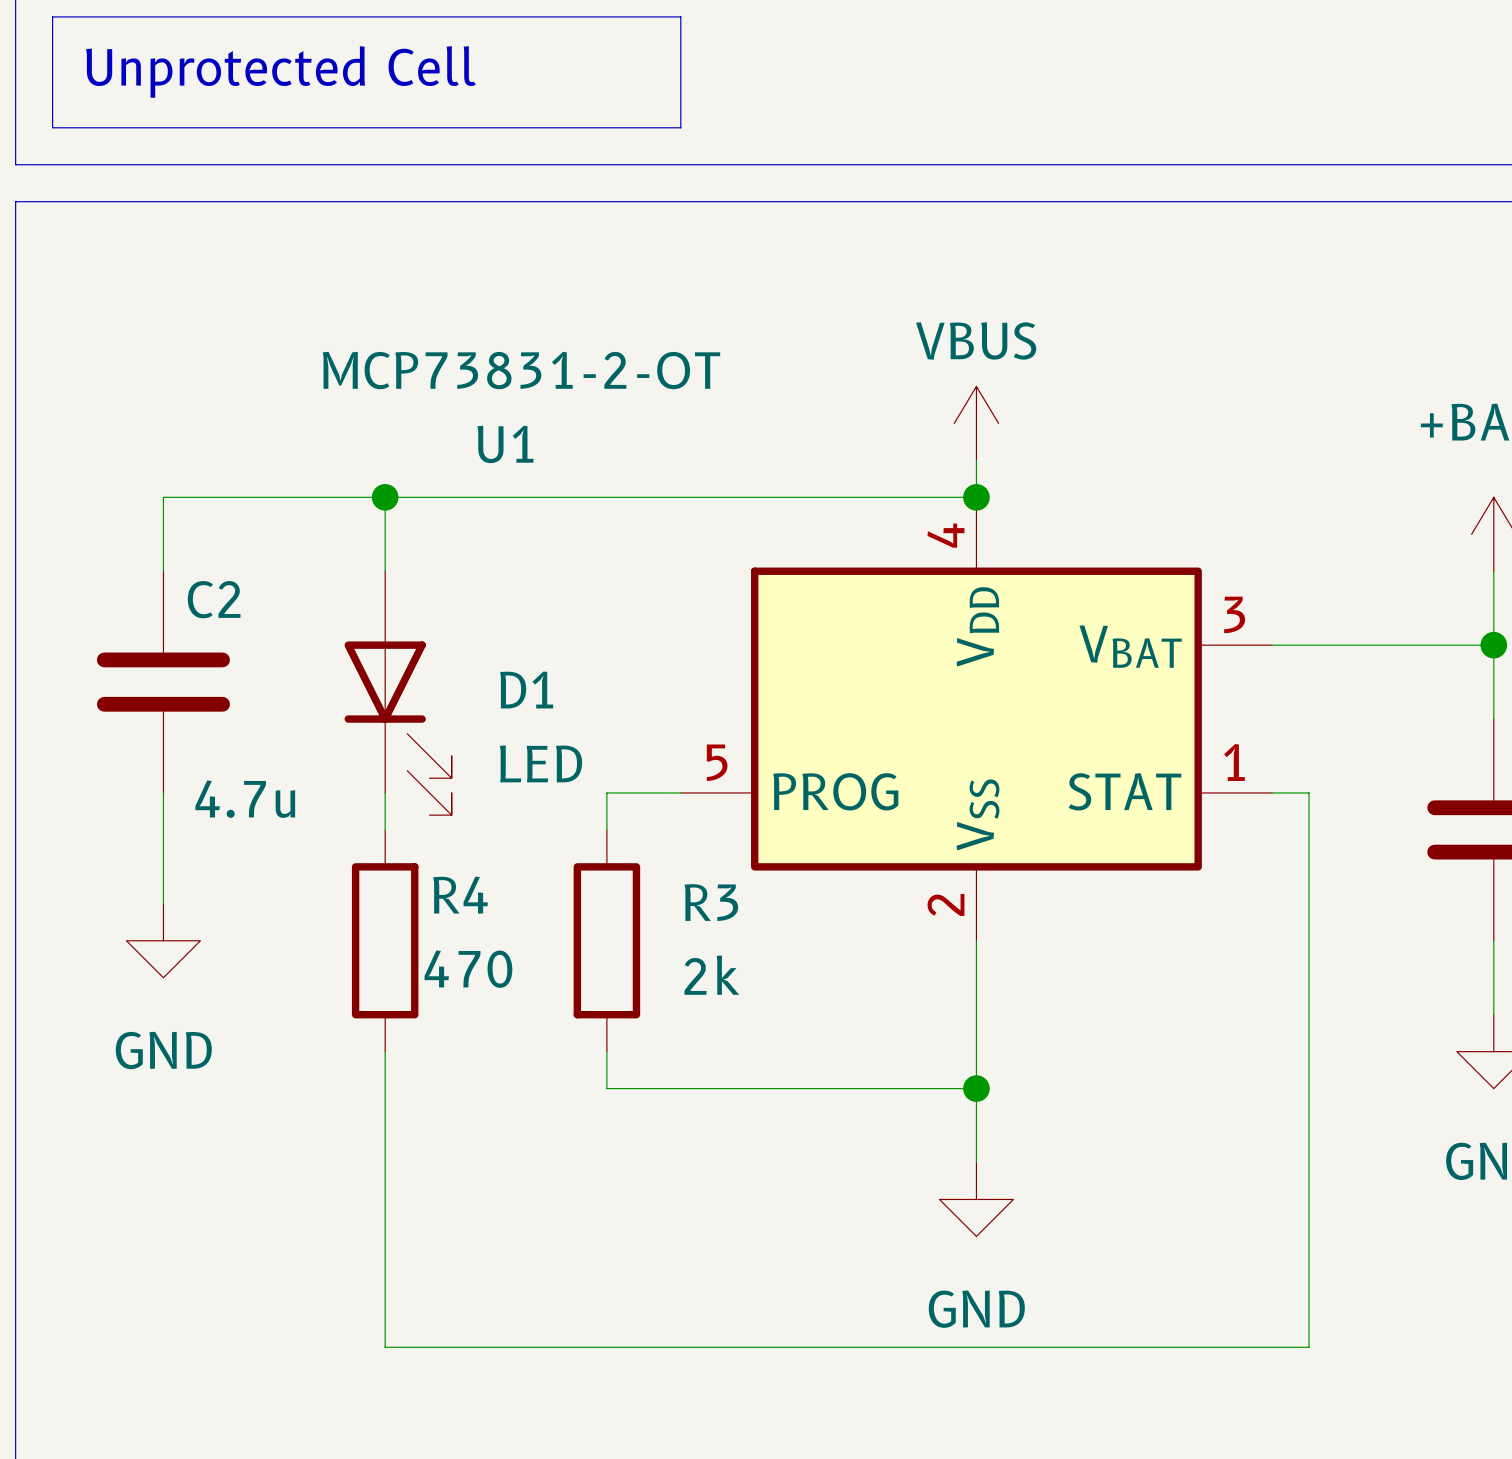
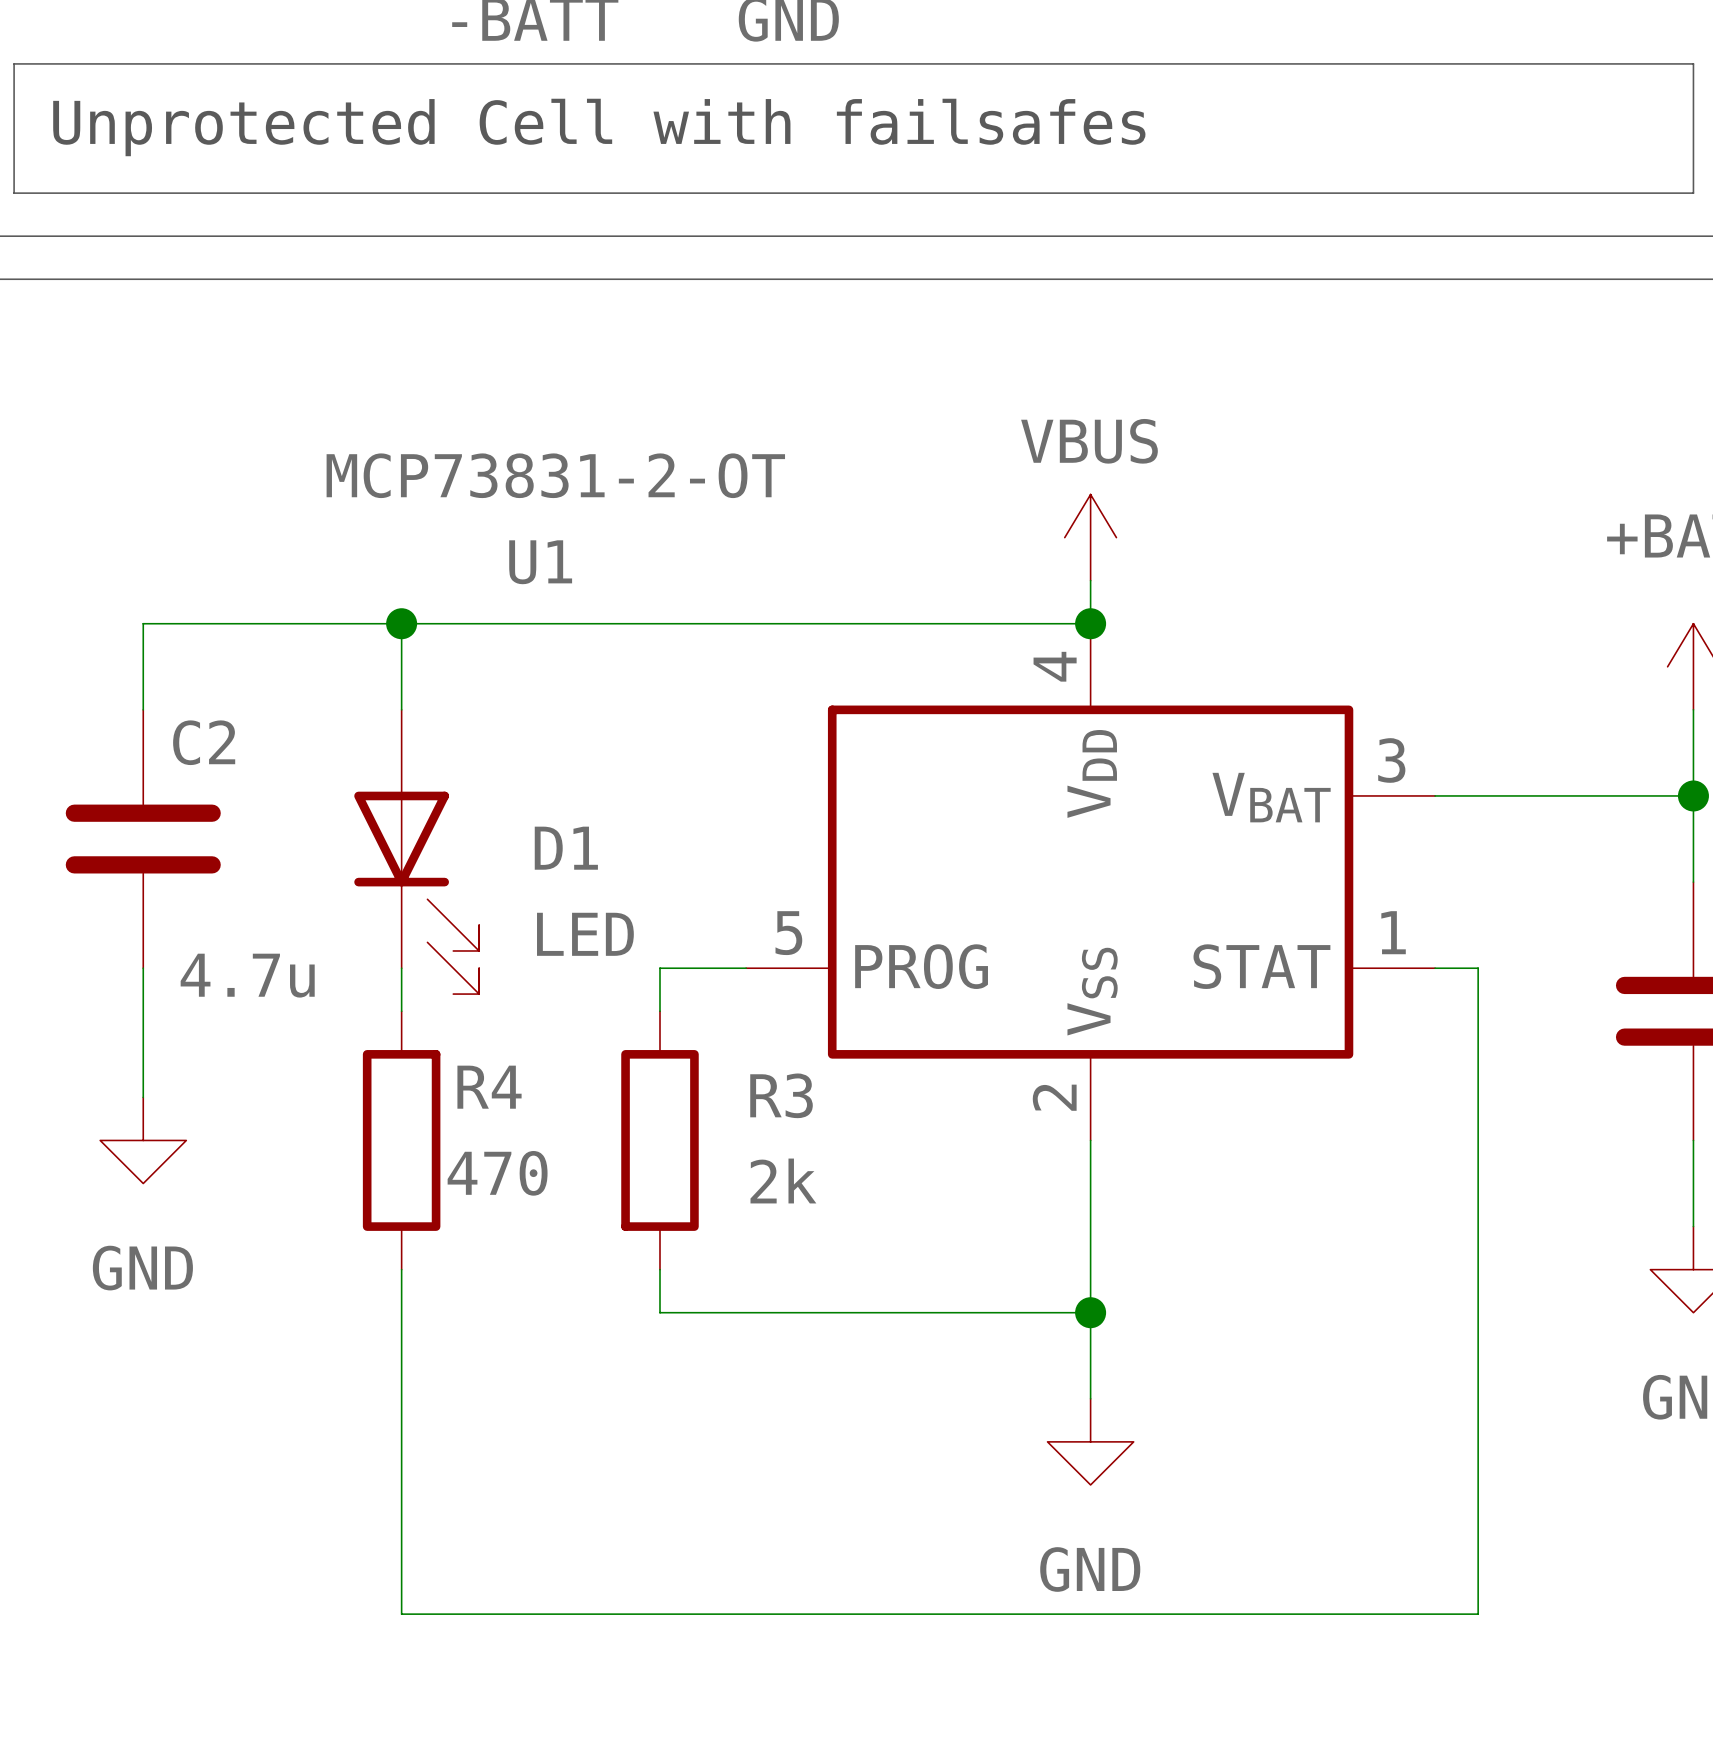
line: (680, 16) (680, 127) -> (746, 63) (1693, 63) (1693, 193) (746, 193)
text: Unprotected Cell (280, 71) -> Unprotected Cell with failsafes (599, 127)

